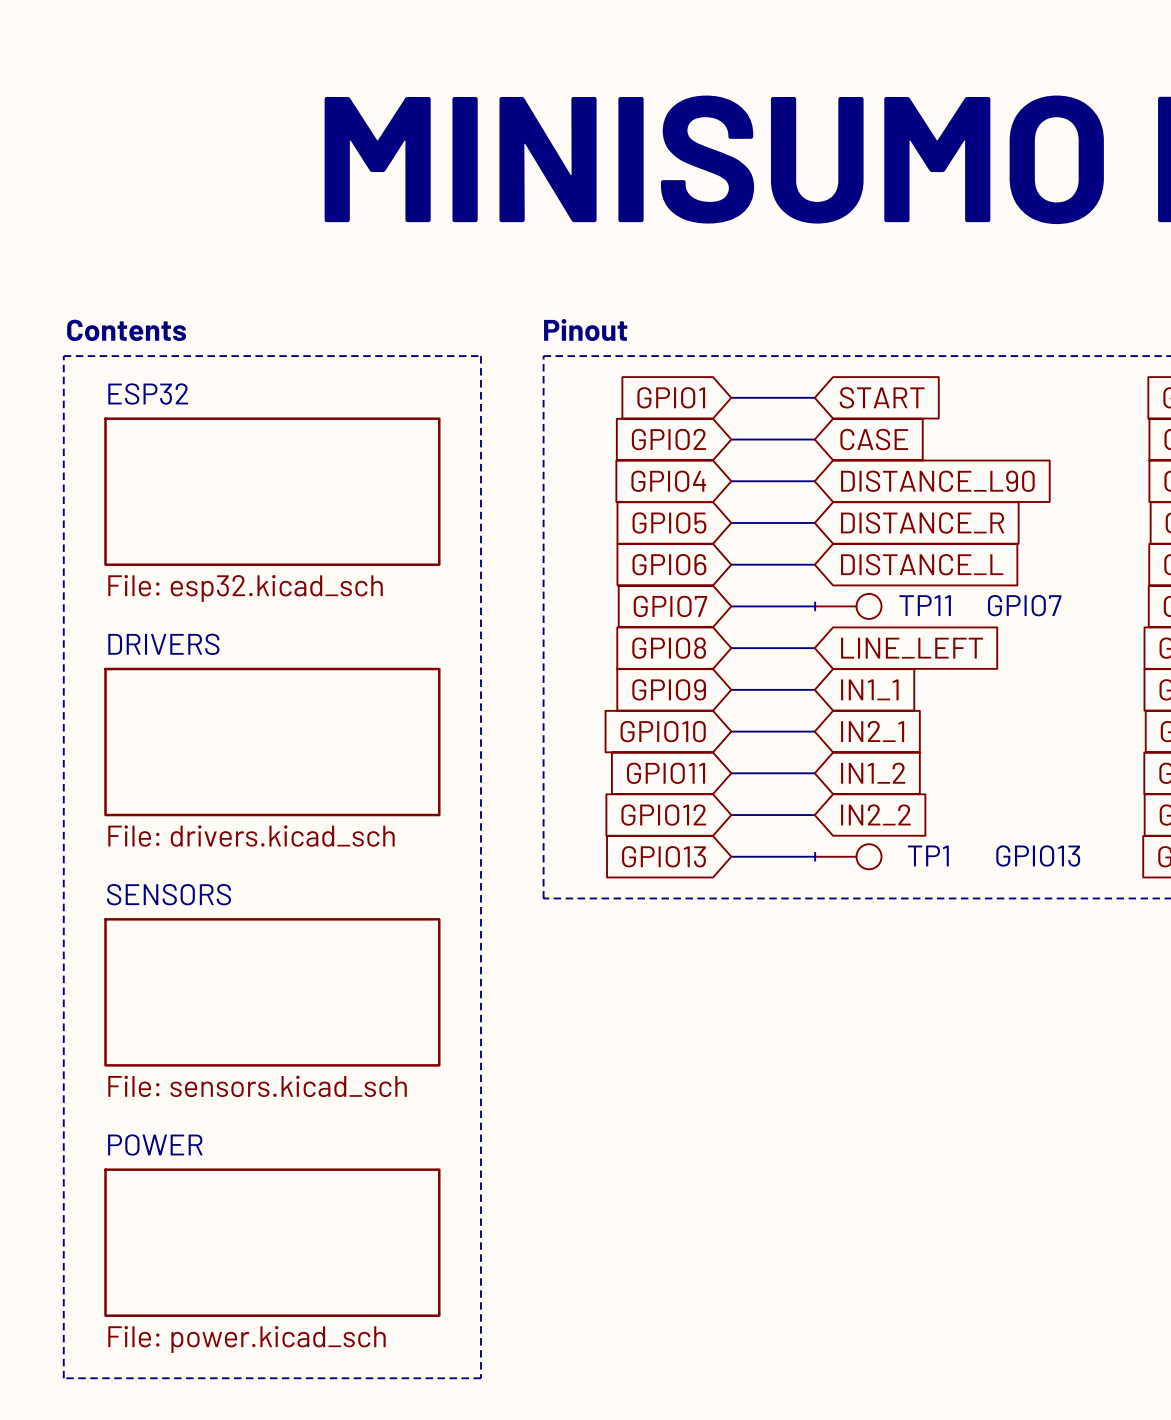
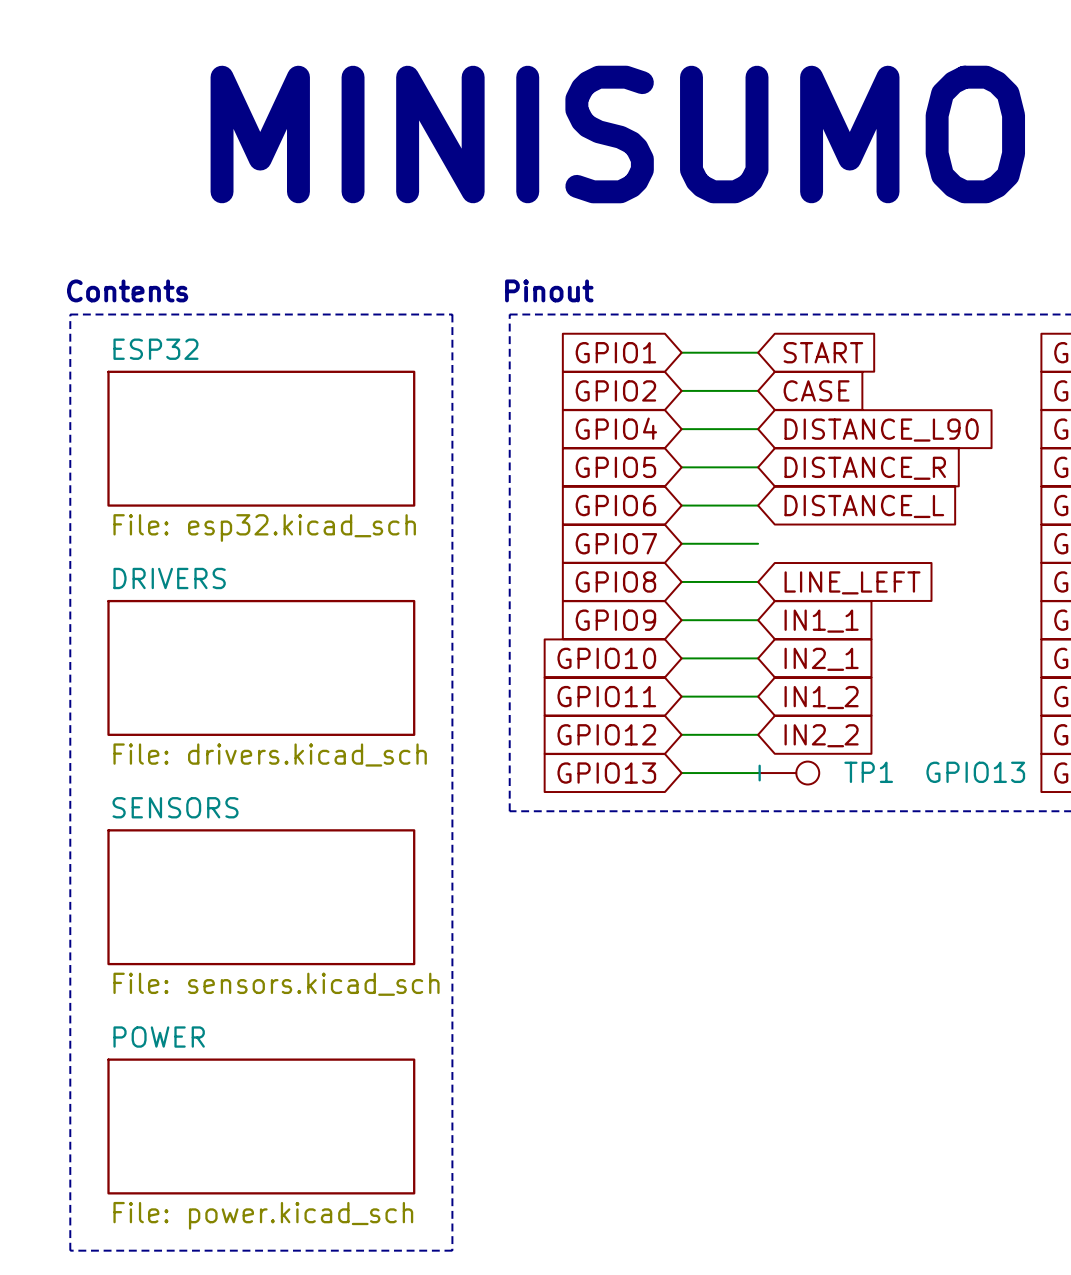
TP11: GPIO7 (848, 606) -> none

